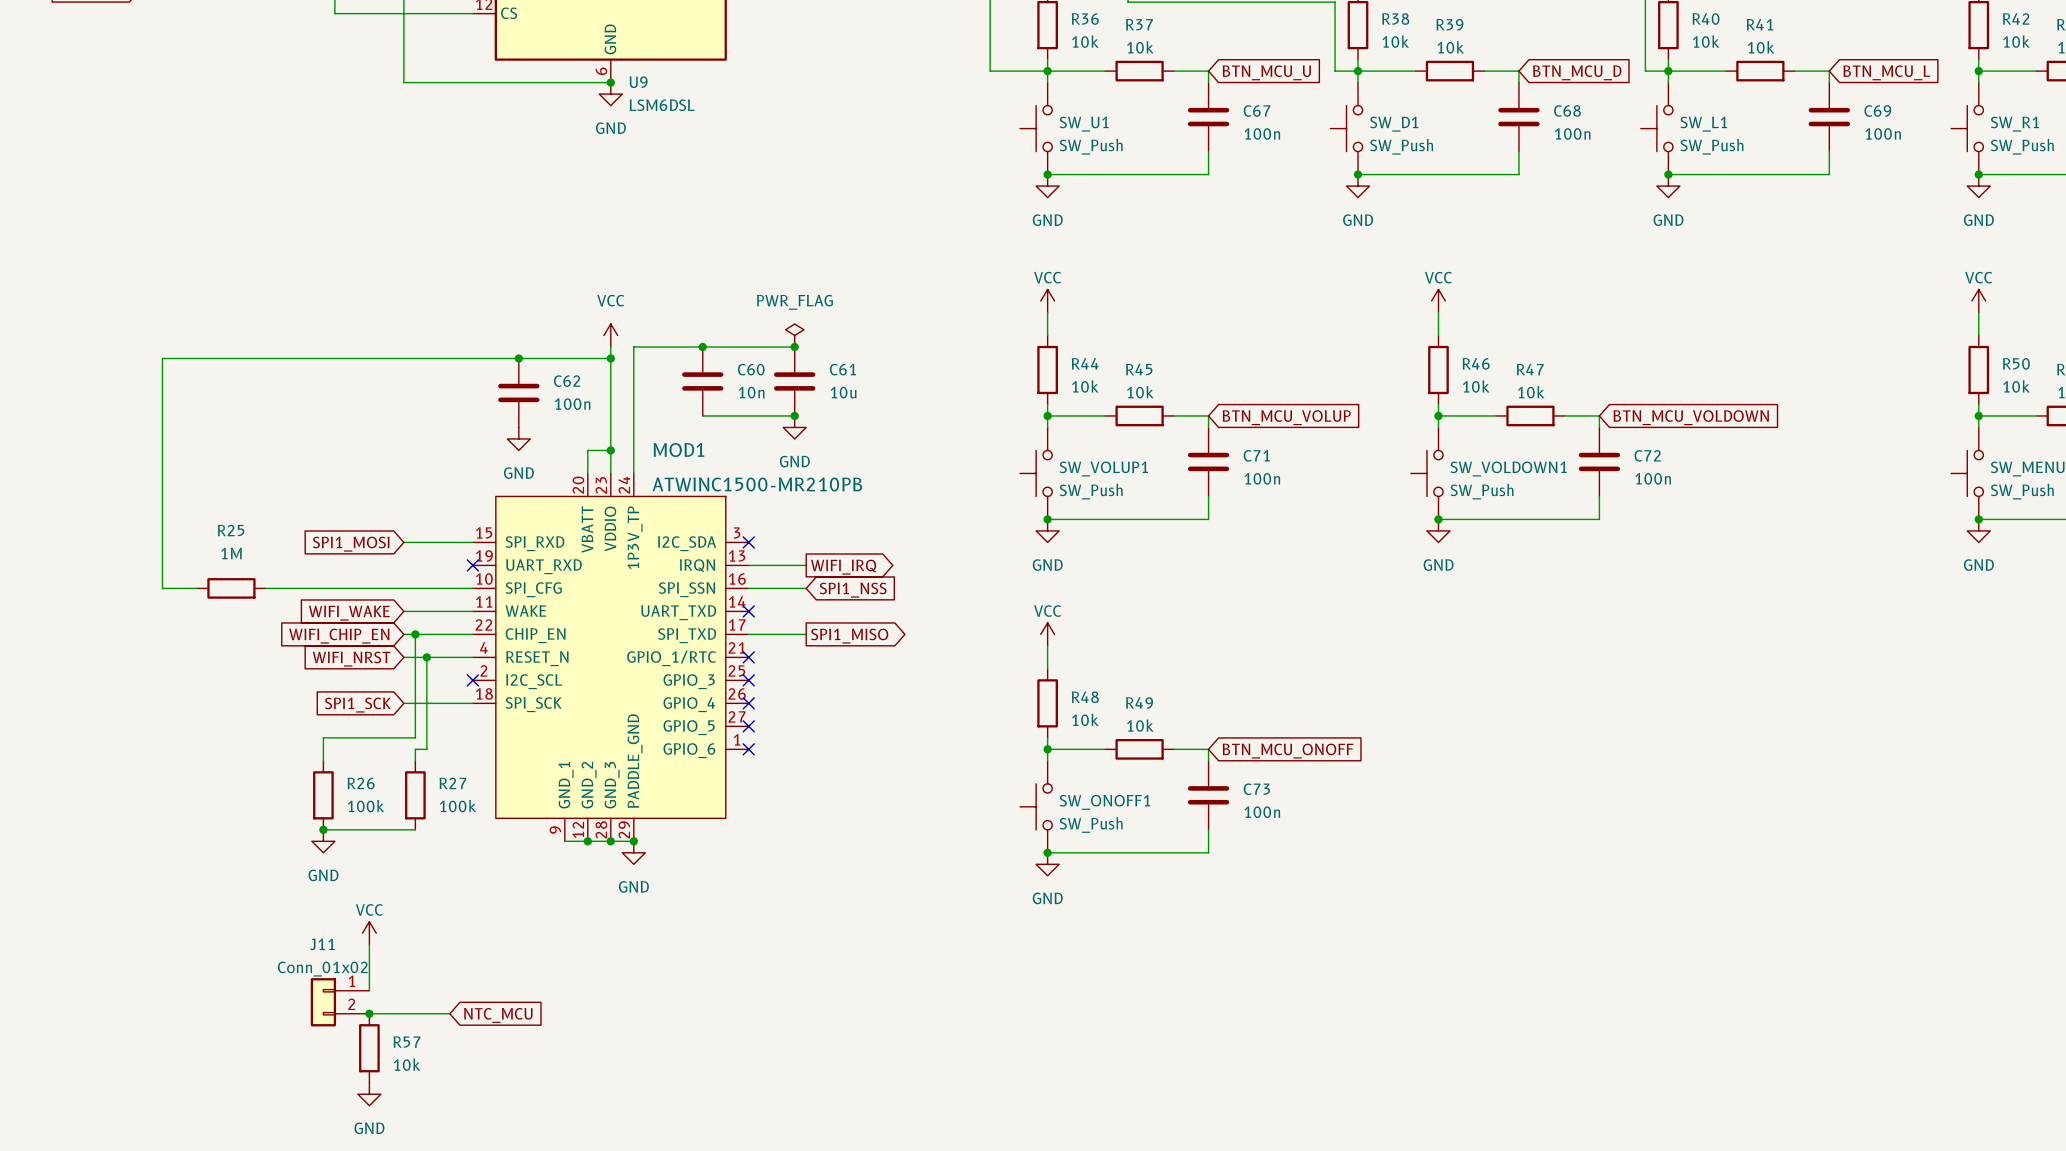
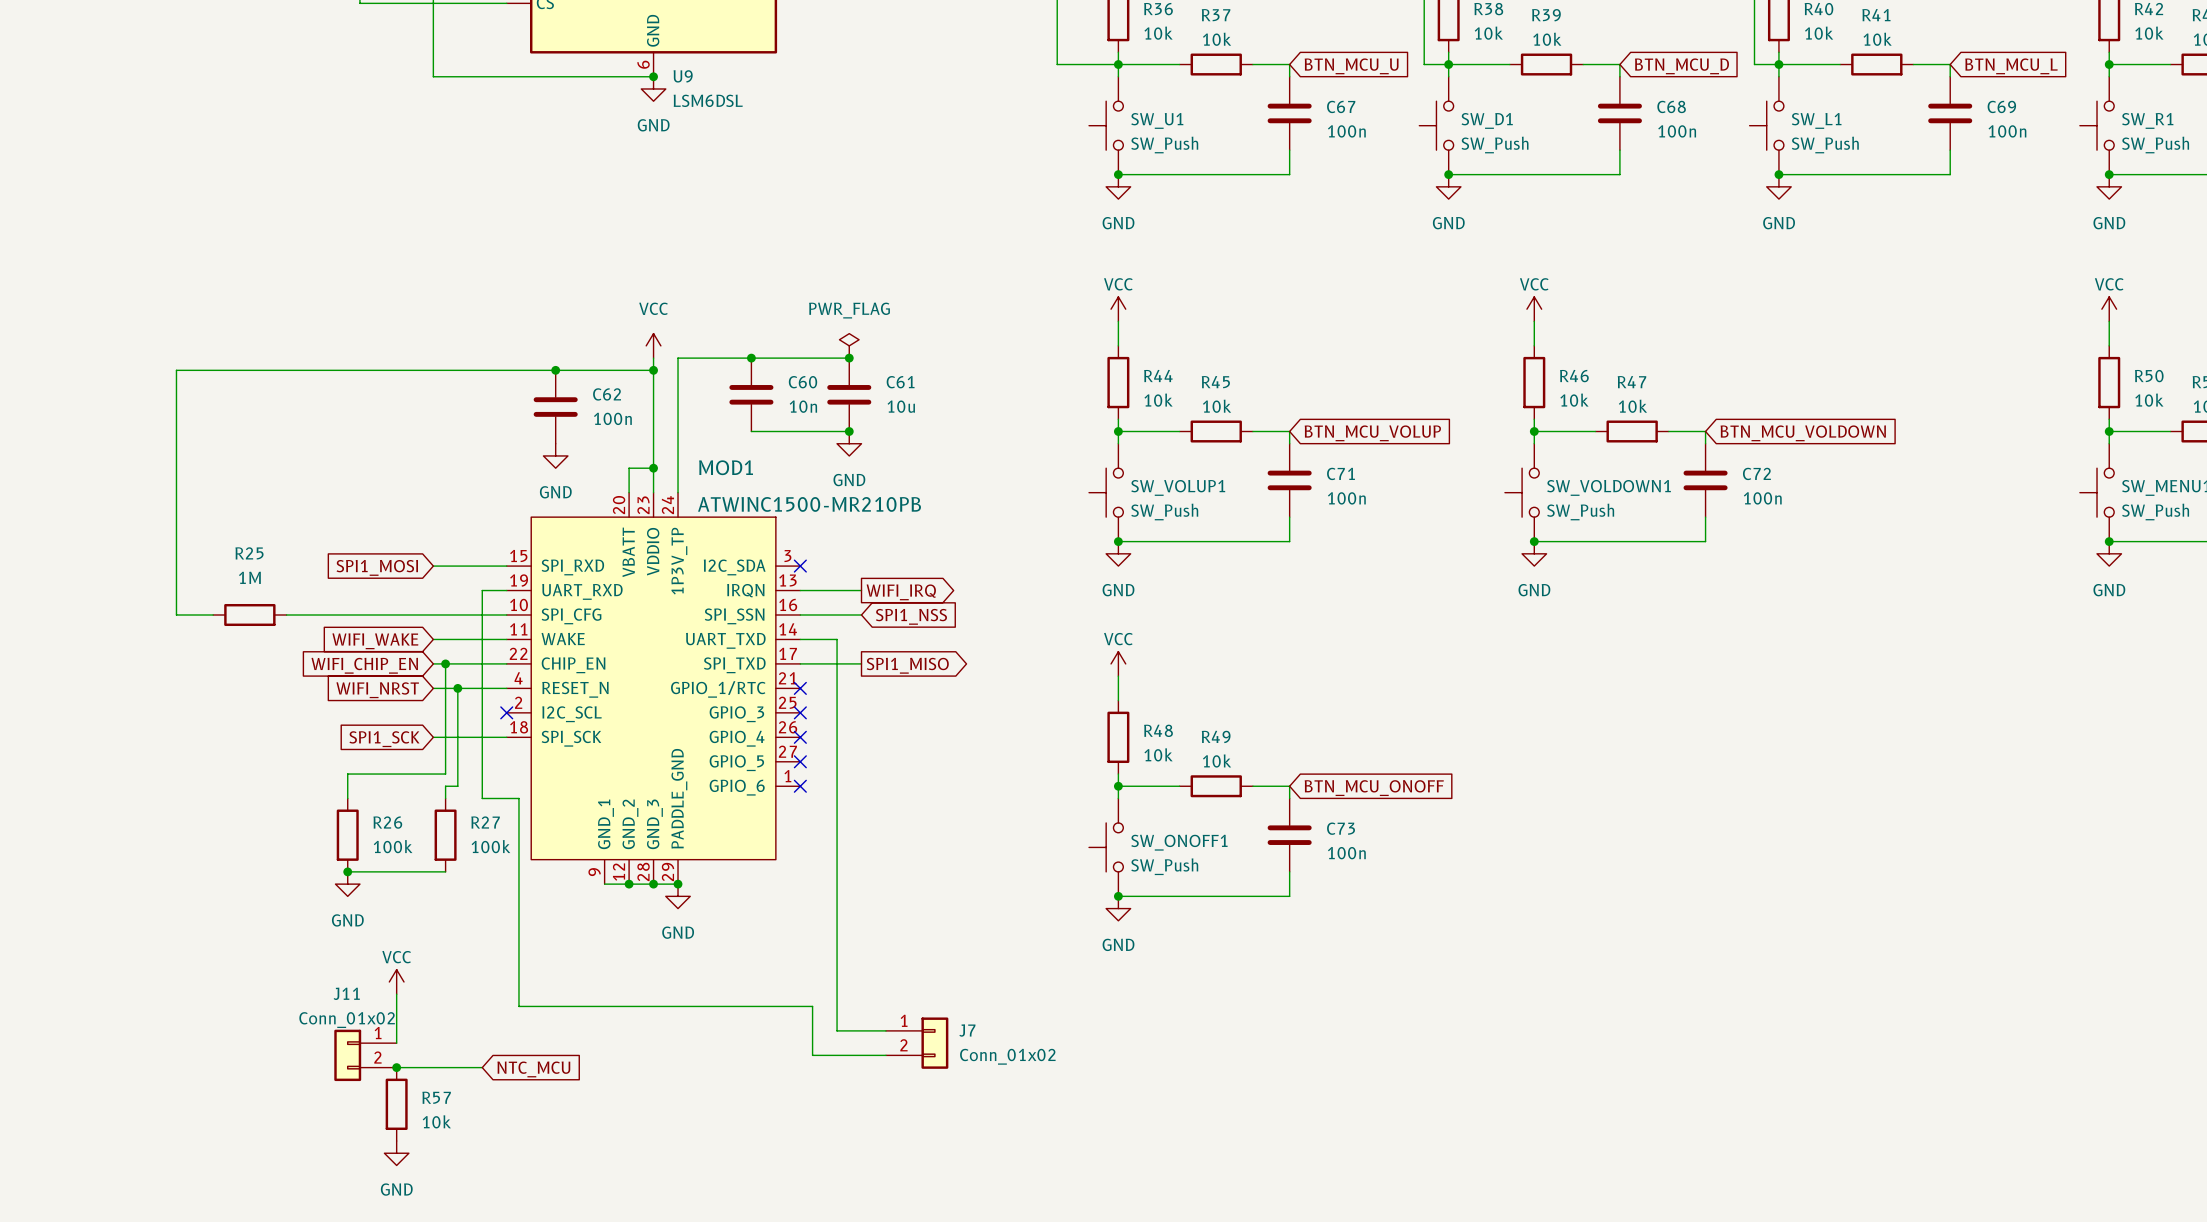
wire: none -> (506, 590) (482, 590) (482, 798) (518, 798) (518, 1006) (812, 1006) (812, 1055) (885, 1055)
no-connect mark: (472, 565) -> none
wire: none -> (800, 639) (837, 639) (837, 1030) (885, 1030)
no-connect mark: (748, 611) -> none
J7: none -> Conn_01x02 (917, 1043)

